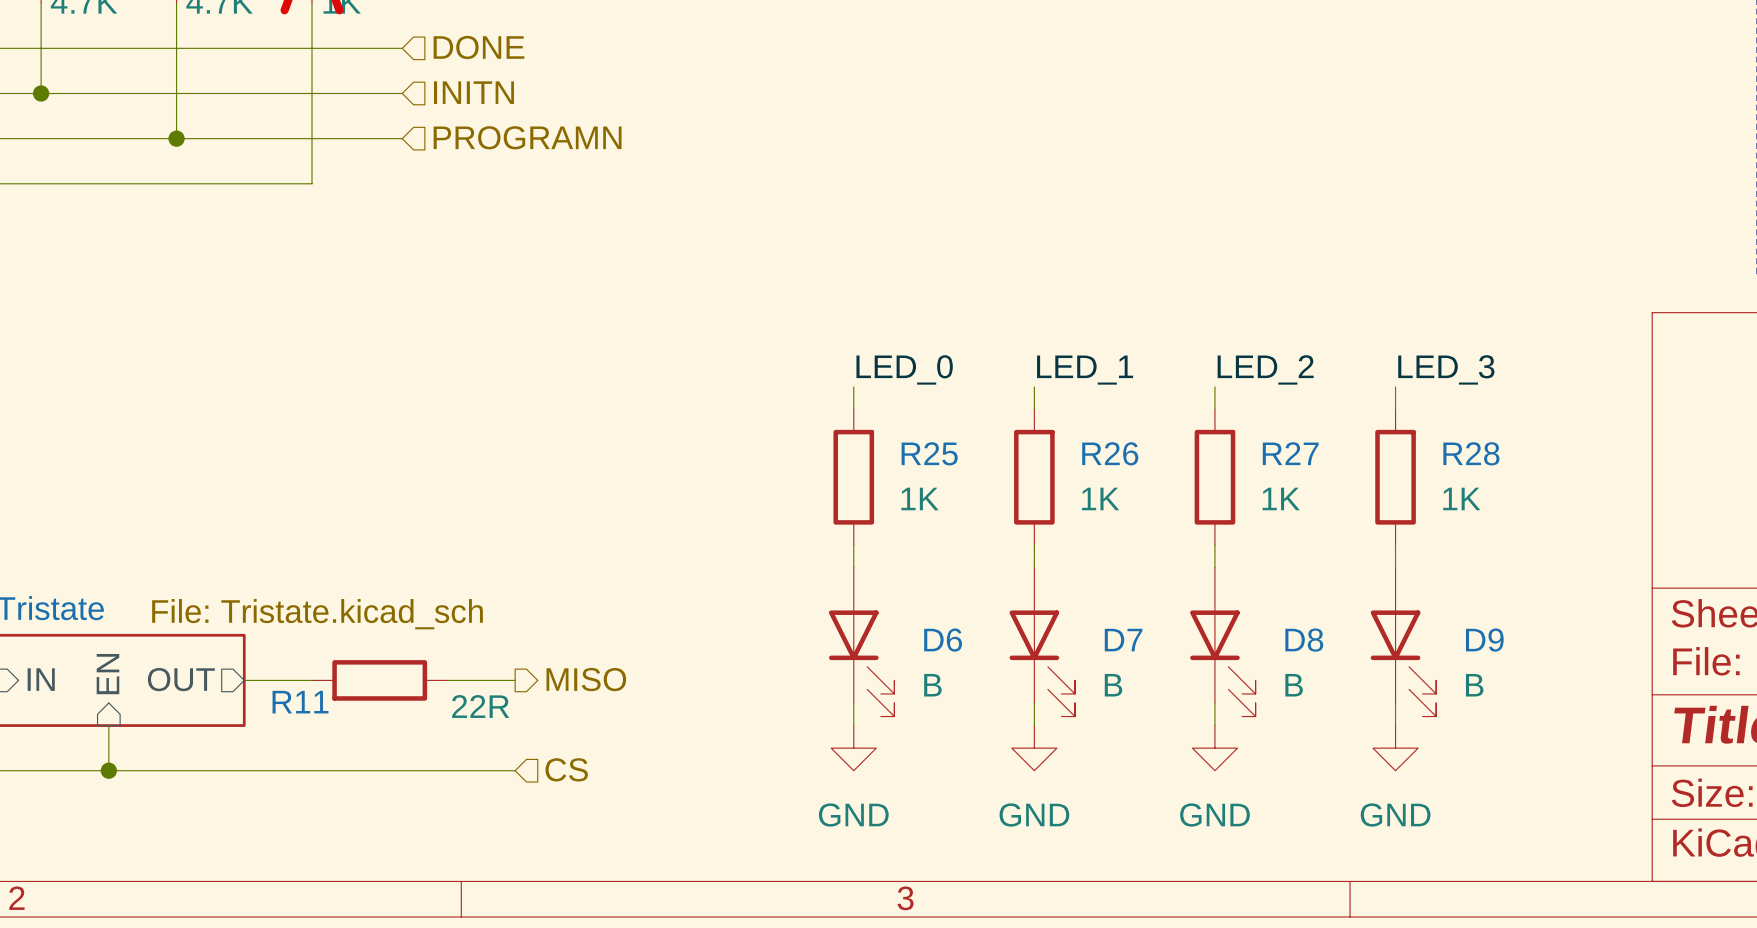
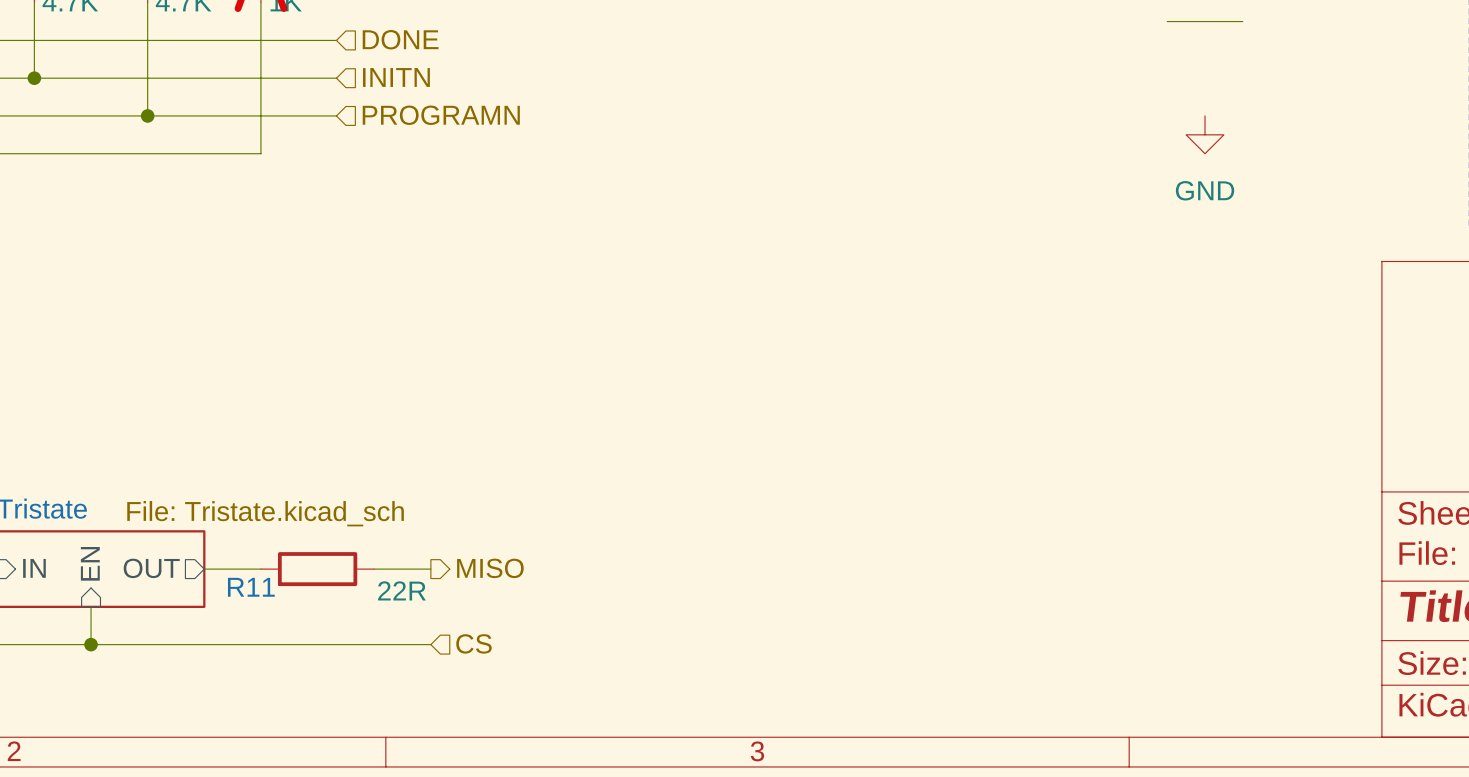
wire: none -> (1167, 21) (1242, 21)
power symbol: none -> GND (1205, 134)
label: LED_0 (904, 369) -> none
label: LED_2 (1265, 369) -> none
label: LED_3 (1446, 369) -> none
label: LED_1 (1085, 370) -> none
wire: (853, 386) (853, 409) -> none
wire: (1034, 386) (1034, 409) -> none
wire: (1214, 386) (1214, 409) -> none
wire: (1395, 386) (1395, 409) -> none
R25: 1K (853, 477) -> none
R26: 1K (1034, 477) -> none
R27: 1K (1214, 477) -> none
R28: 1K (1395, 477) -> none
wire: (853, 544) (853, 567) -> none
wire: (1034, 544) (1034, 567) -> none
wire: (1214, 544) (1214, 567) -> none
wire: (1395, 544) (1395, 567) -> none
D6: B (861, 642) -> none
D7: B (1042, 642) -> none
D8: B (1222, 642) -> none
D9: B (1403, 642) -> none
wire: (853, 702) (853, 725) -> none
wire: (1034, 702) (1034, 725) -> none
wire: (1214, 702) (1214, 725) -> none
wire: (1395, 702) (1395, 725) -> none
power symbol: GND (853, 748) -> none
power symbol: GND (1034, 748) -> none
power symbol: GND (1214, 748) -> none
power symbol: GND (1395, 748) -> none

